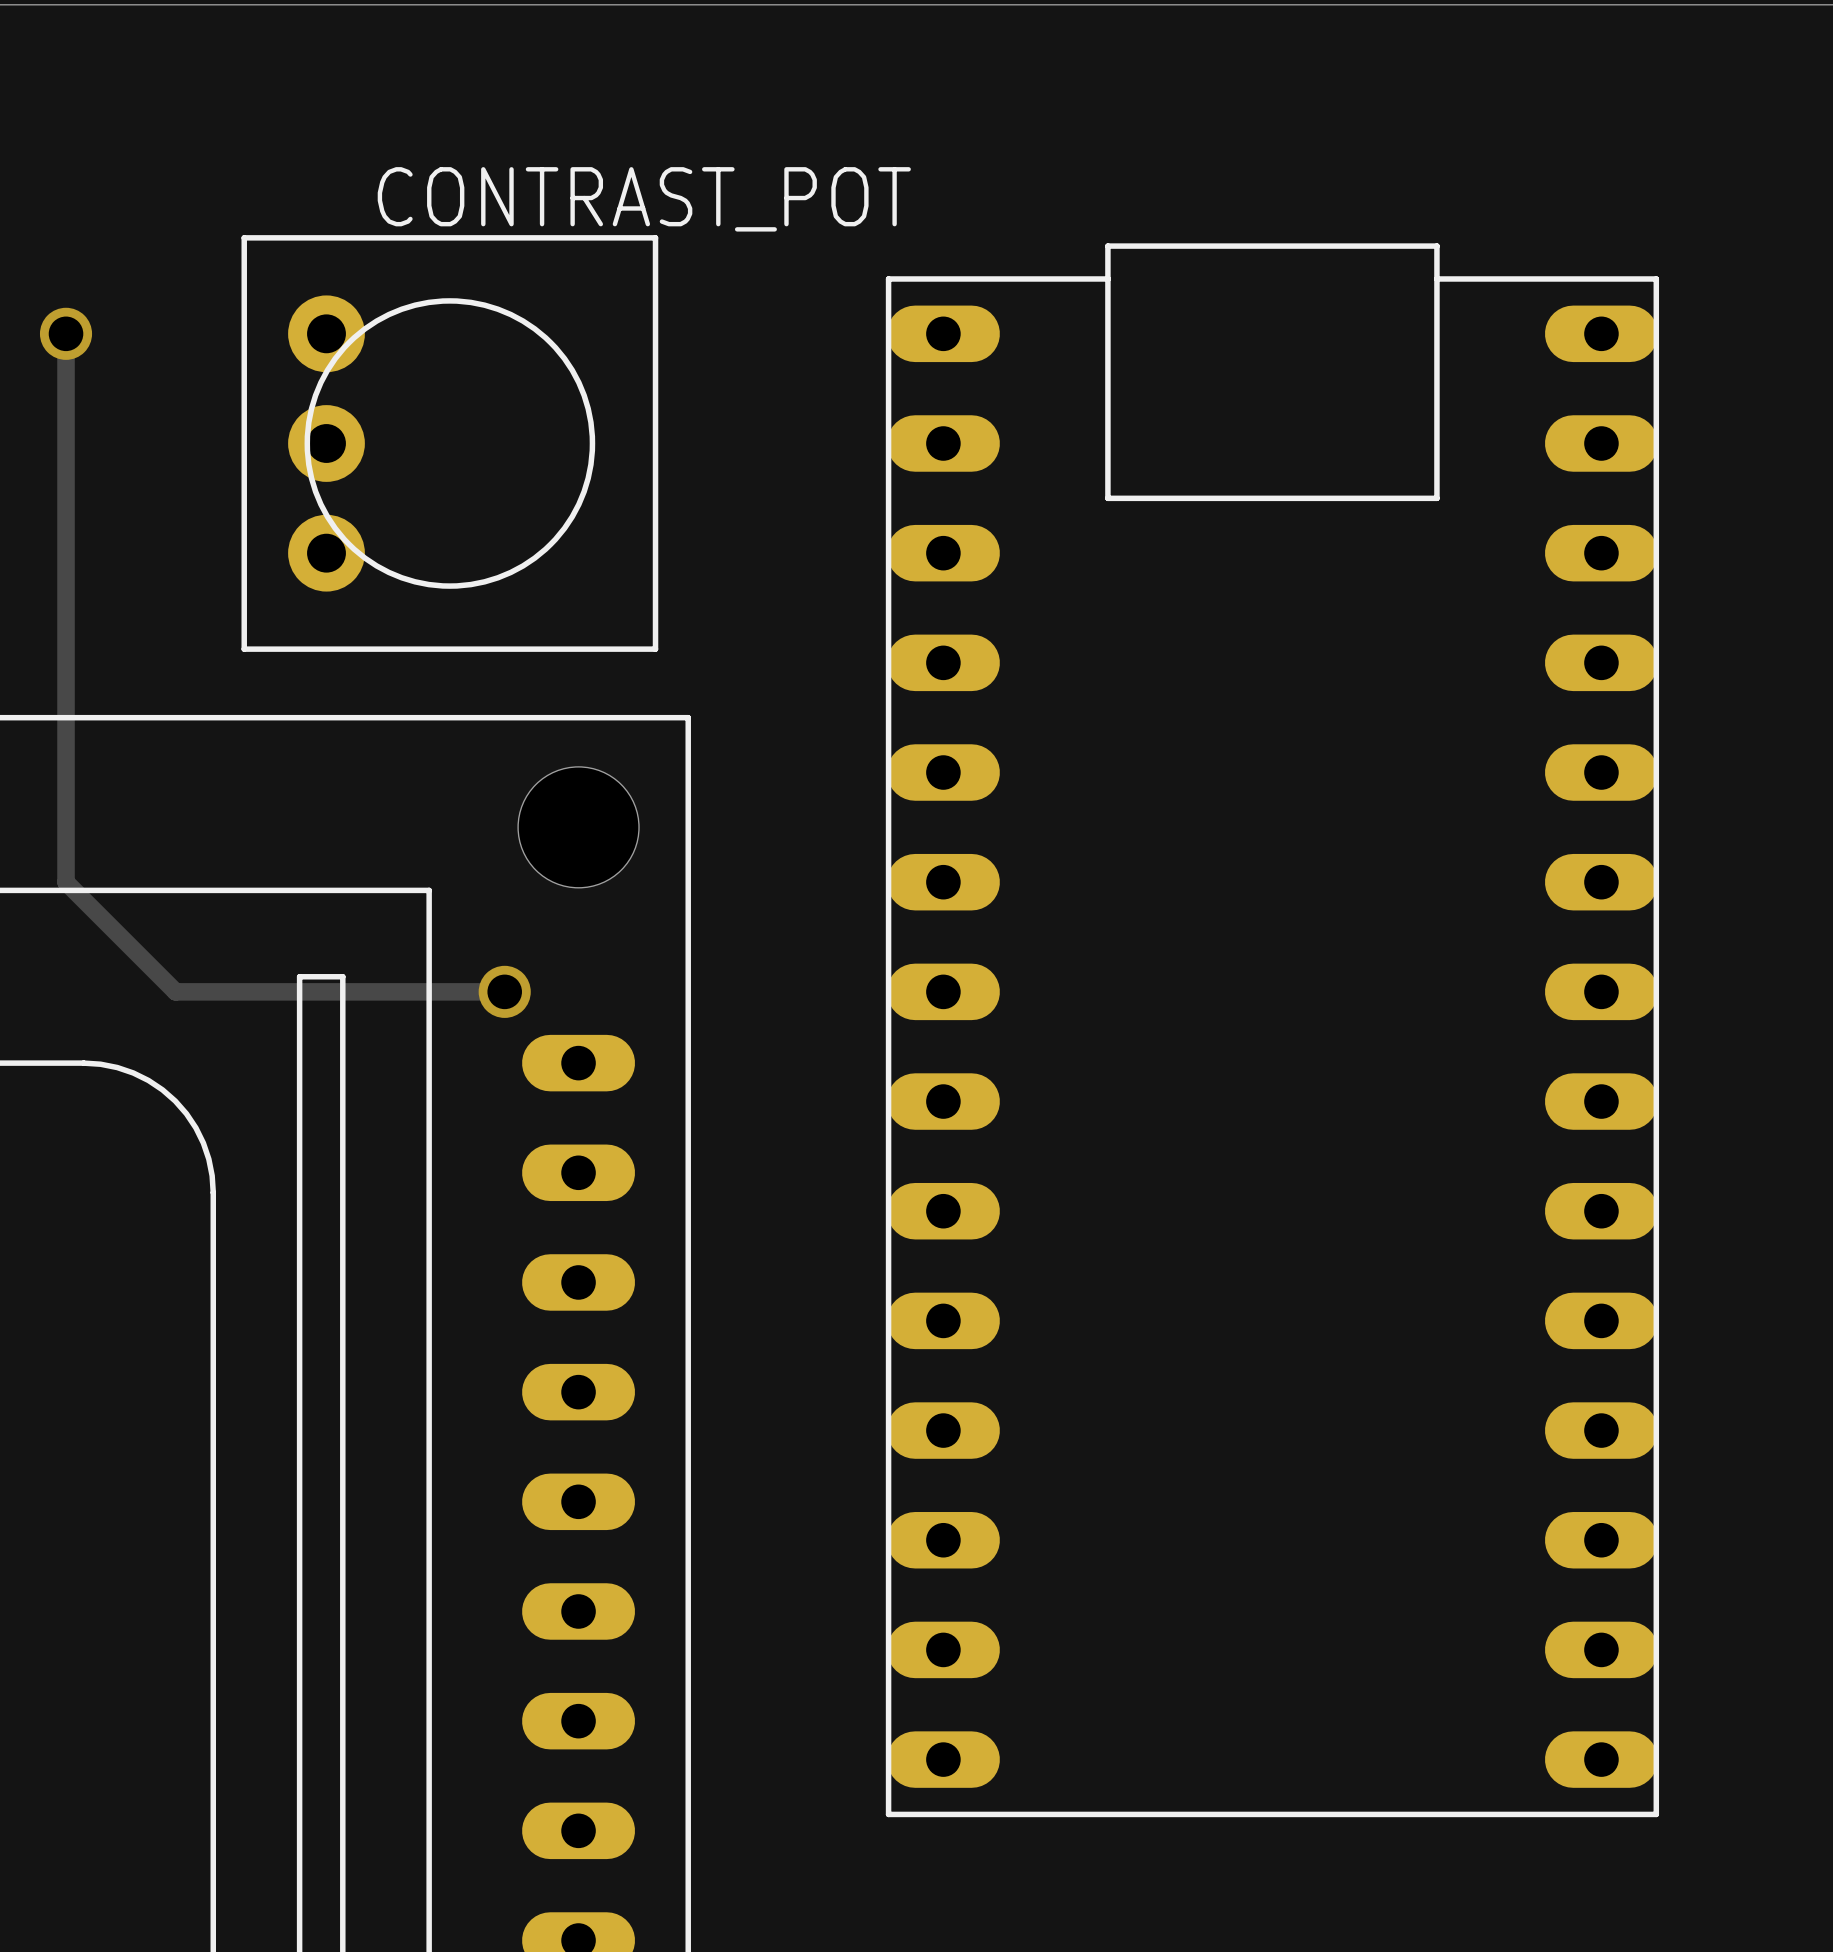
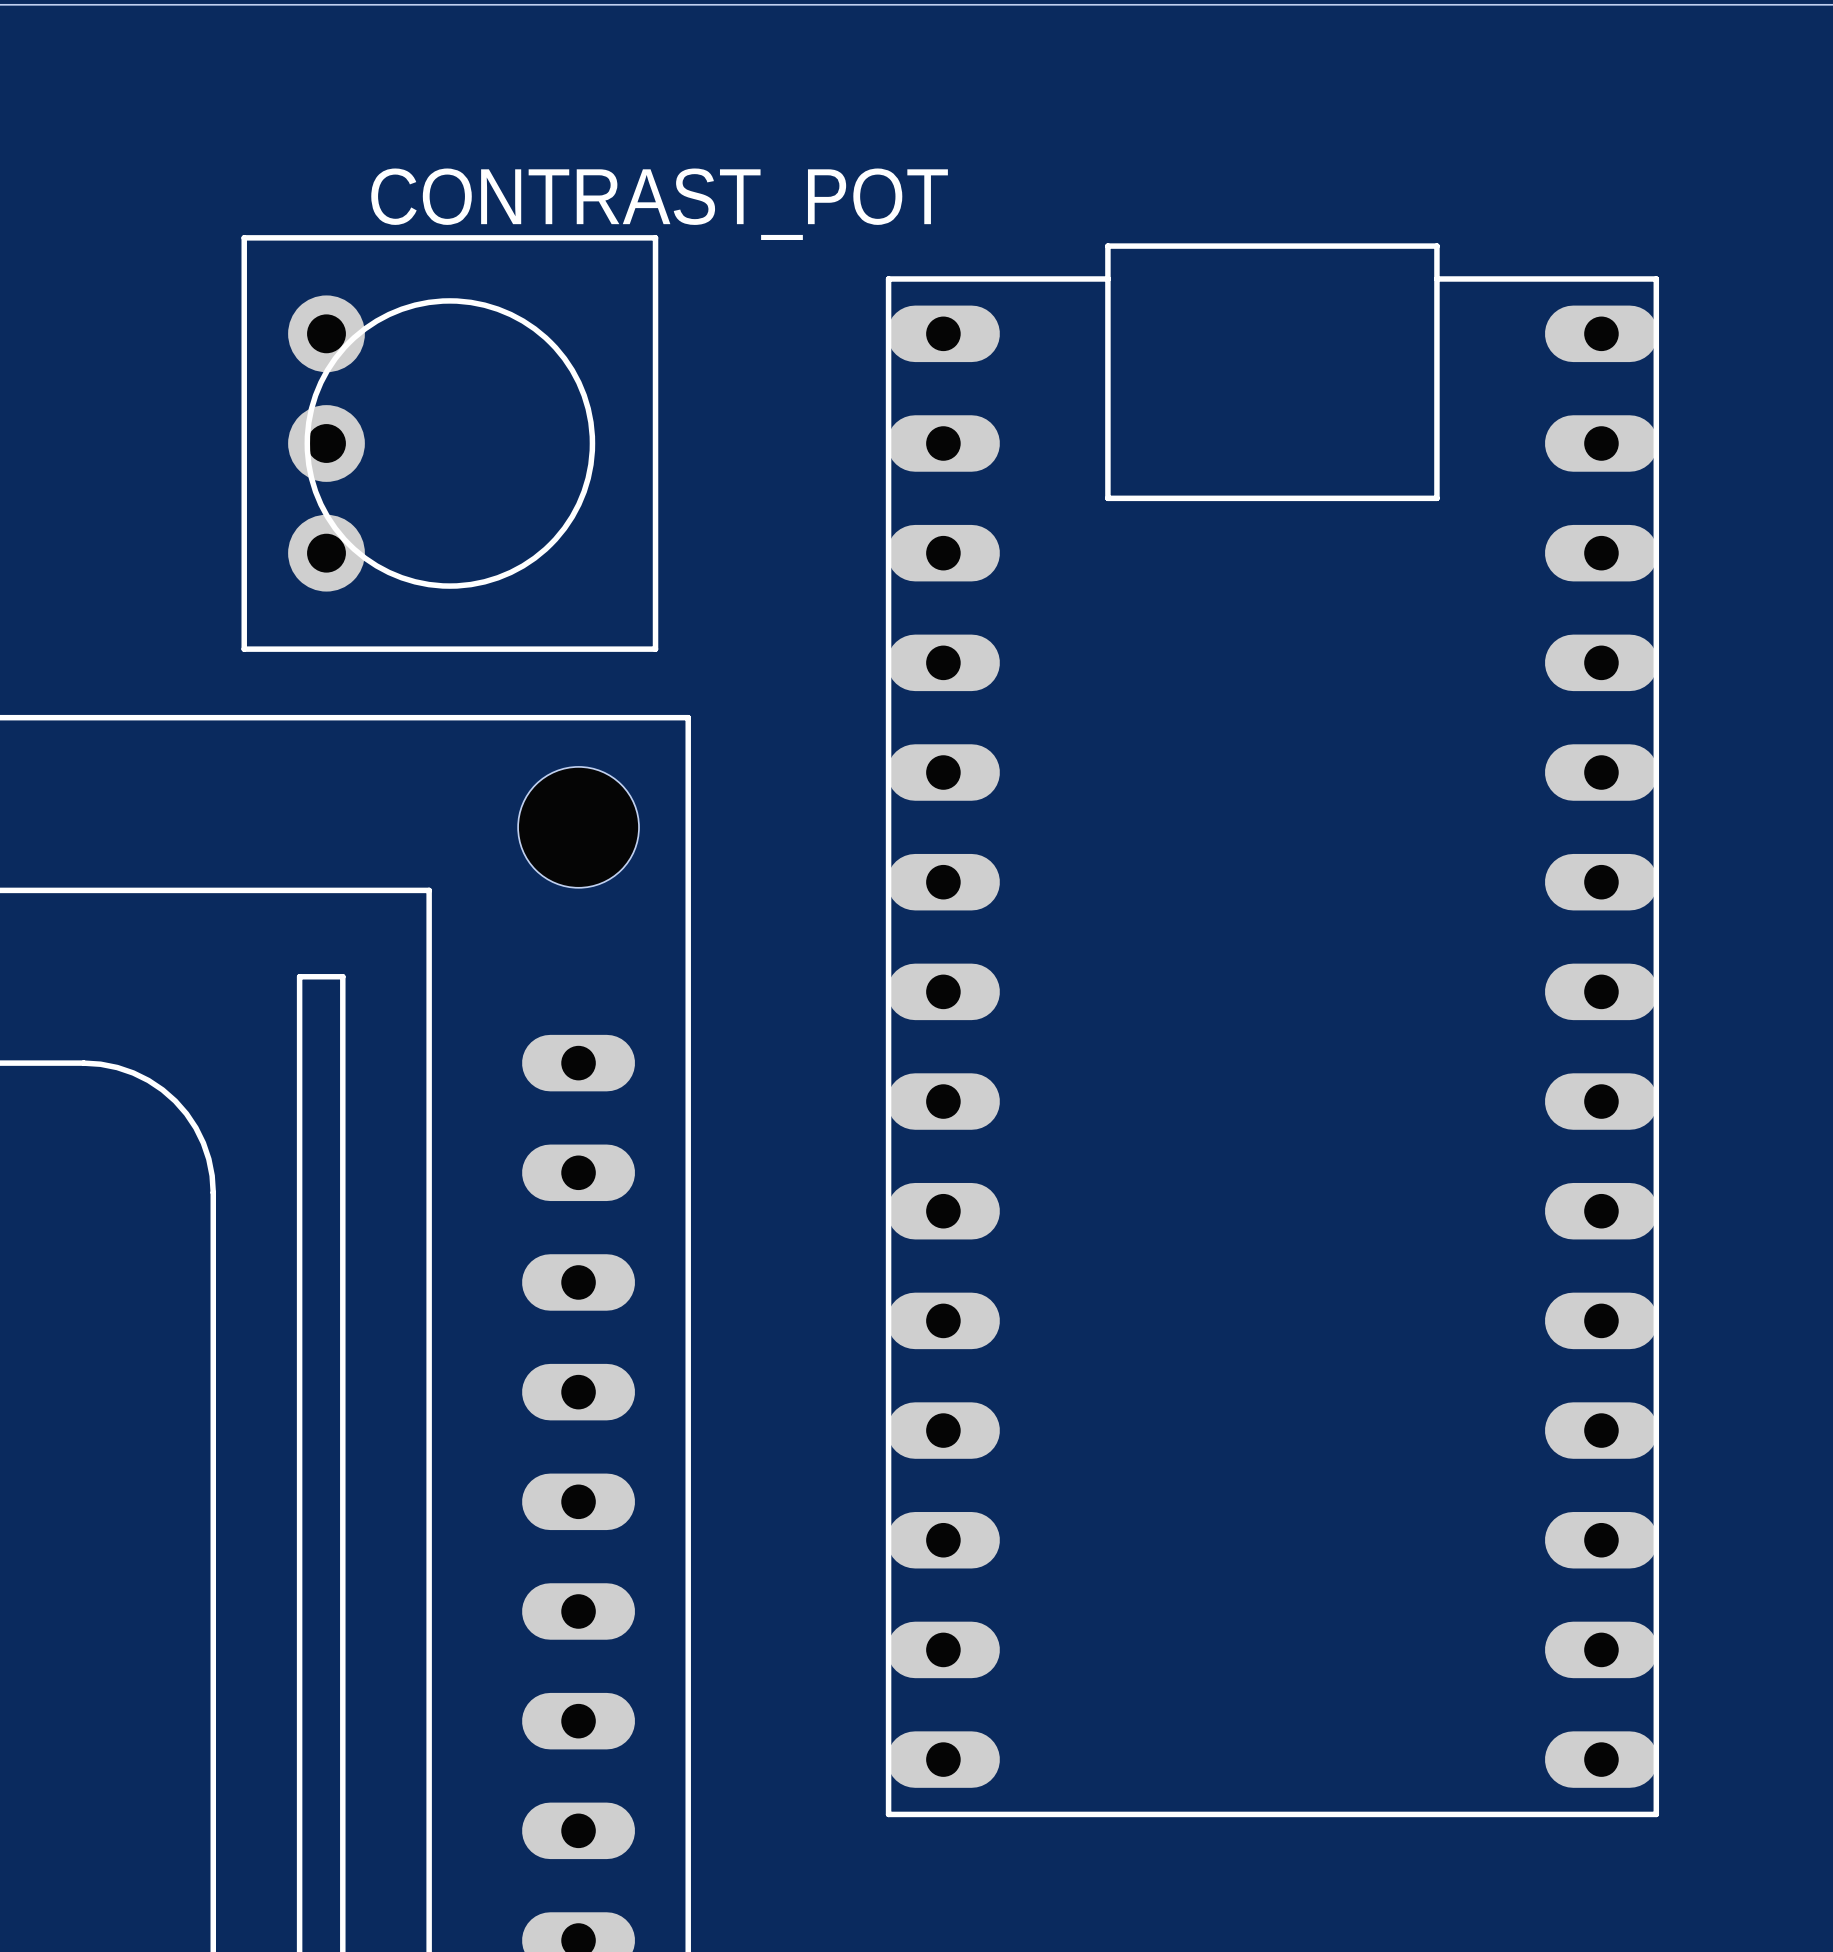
track: (66, 333) (66, 882) (175, 991) (504, 991) -> none
via: (66, 333) -> none
via: (504, 991) -> none

